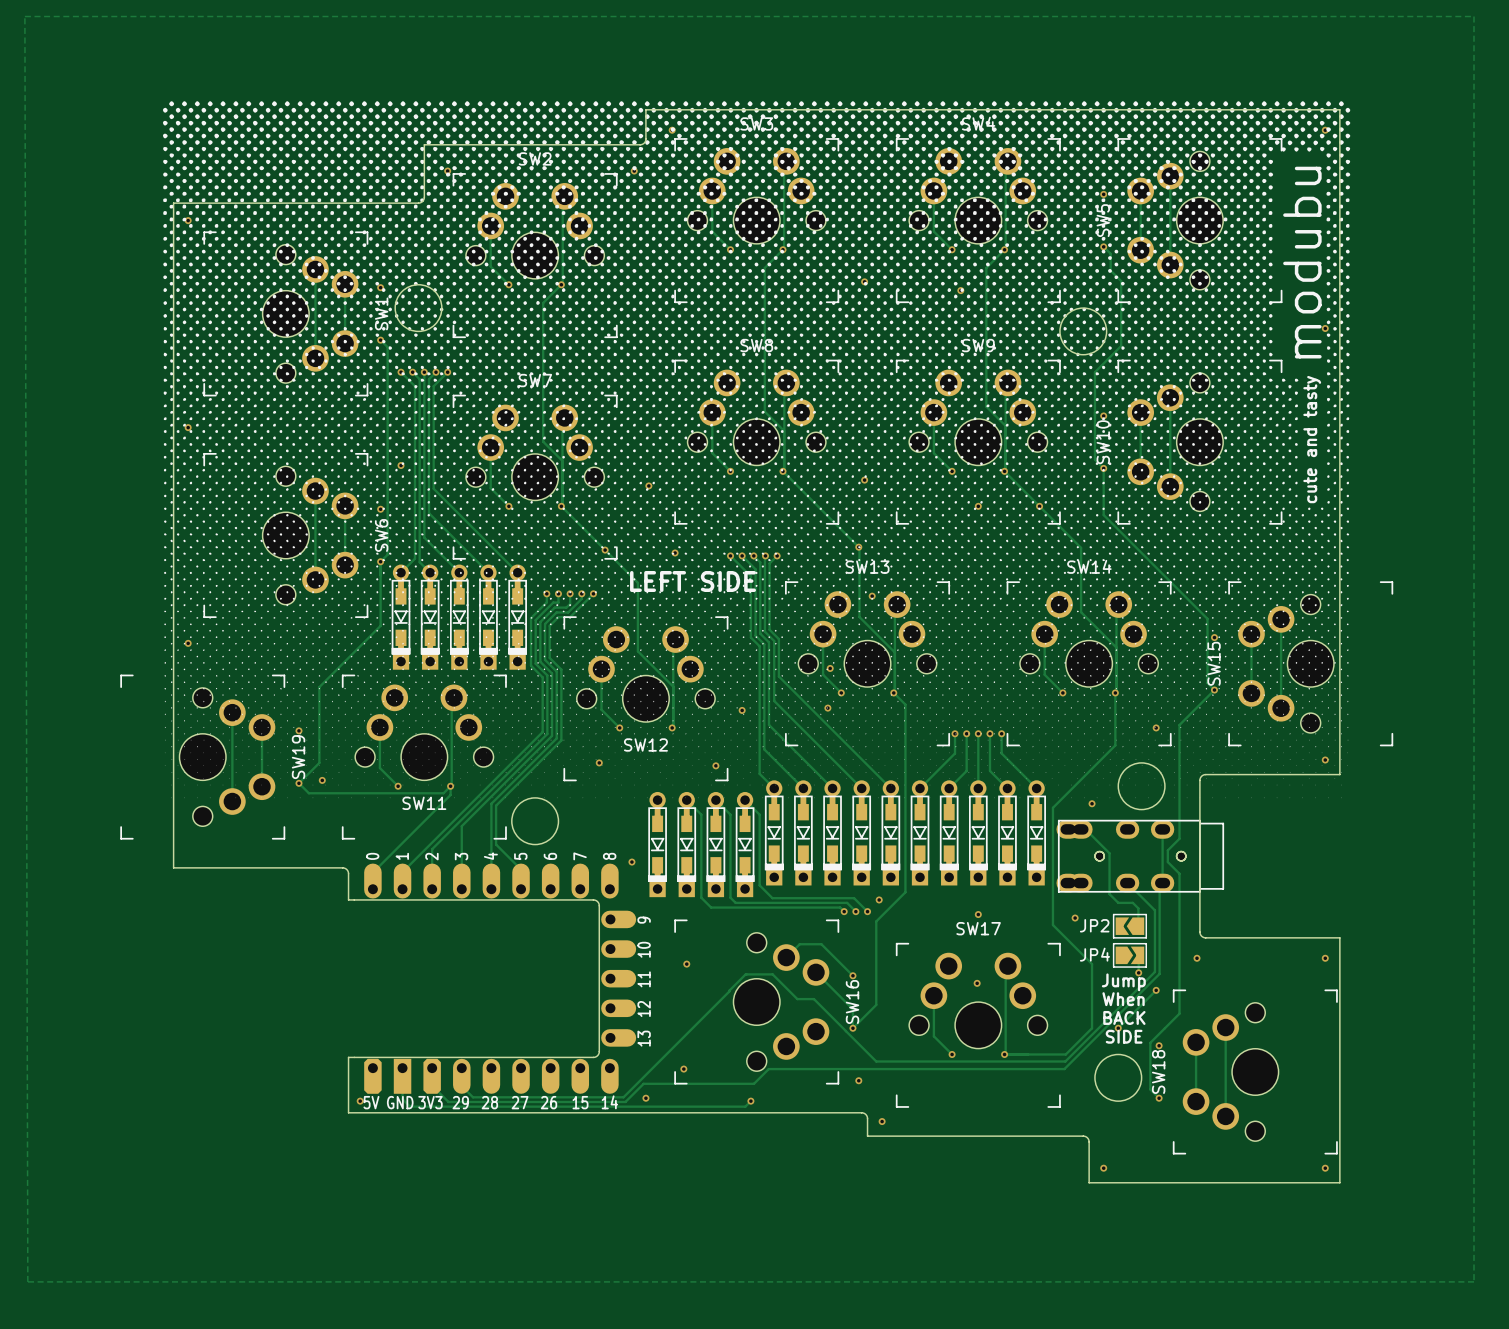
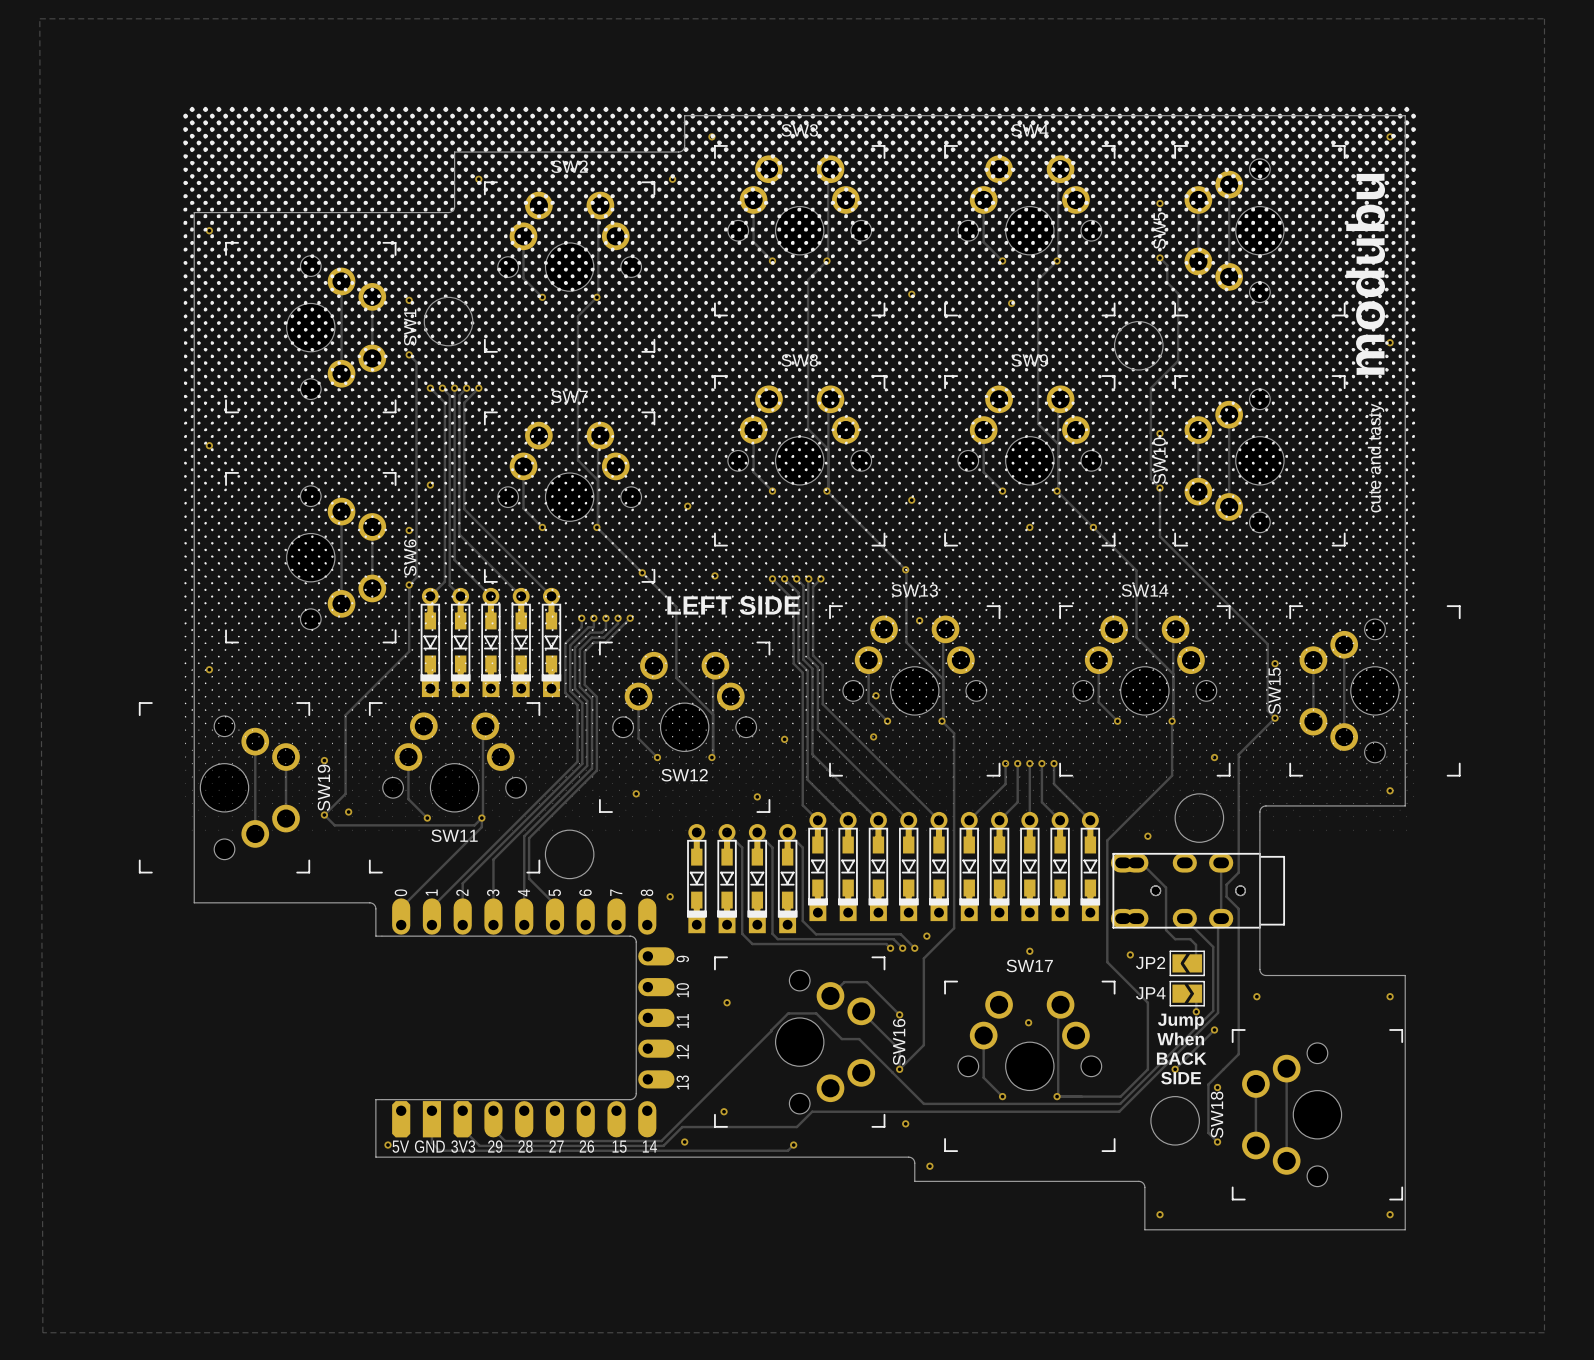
drawing shape: [162, 101, 1351, 799] -> [183, 106, 1417, 831]

